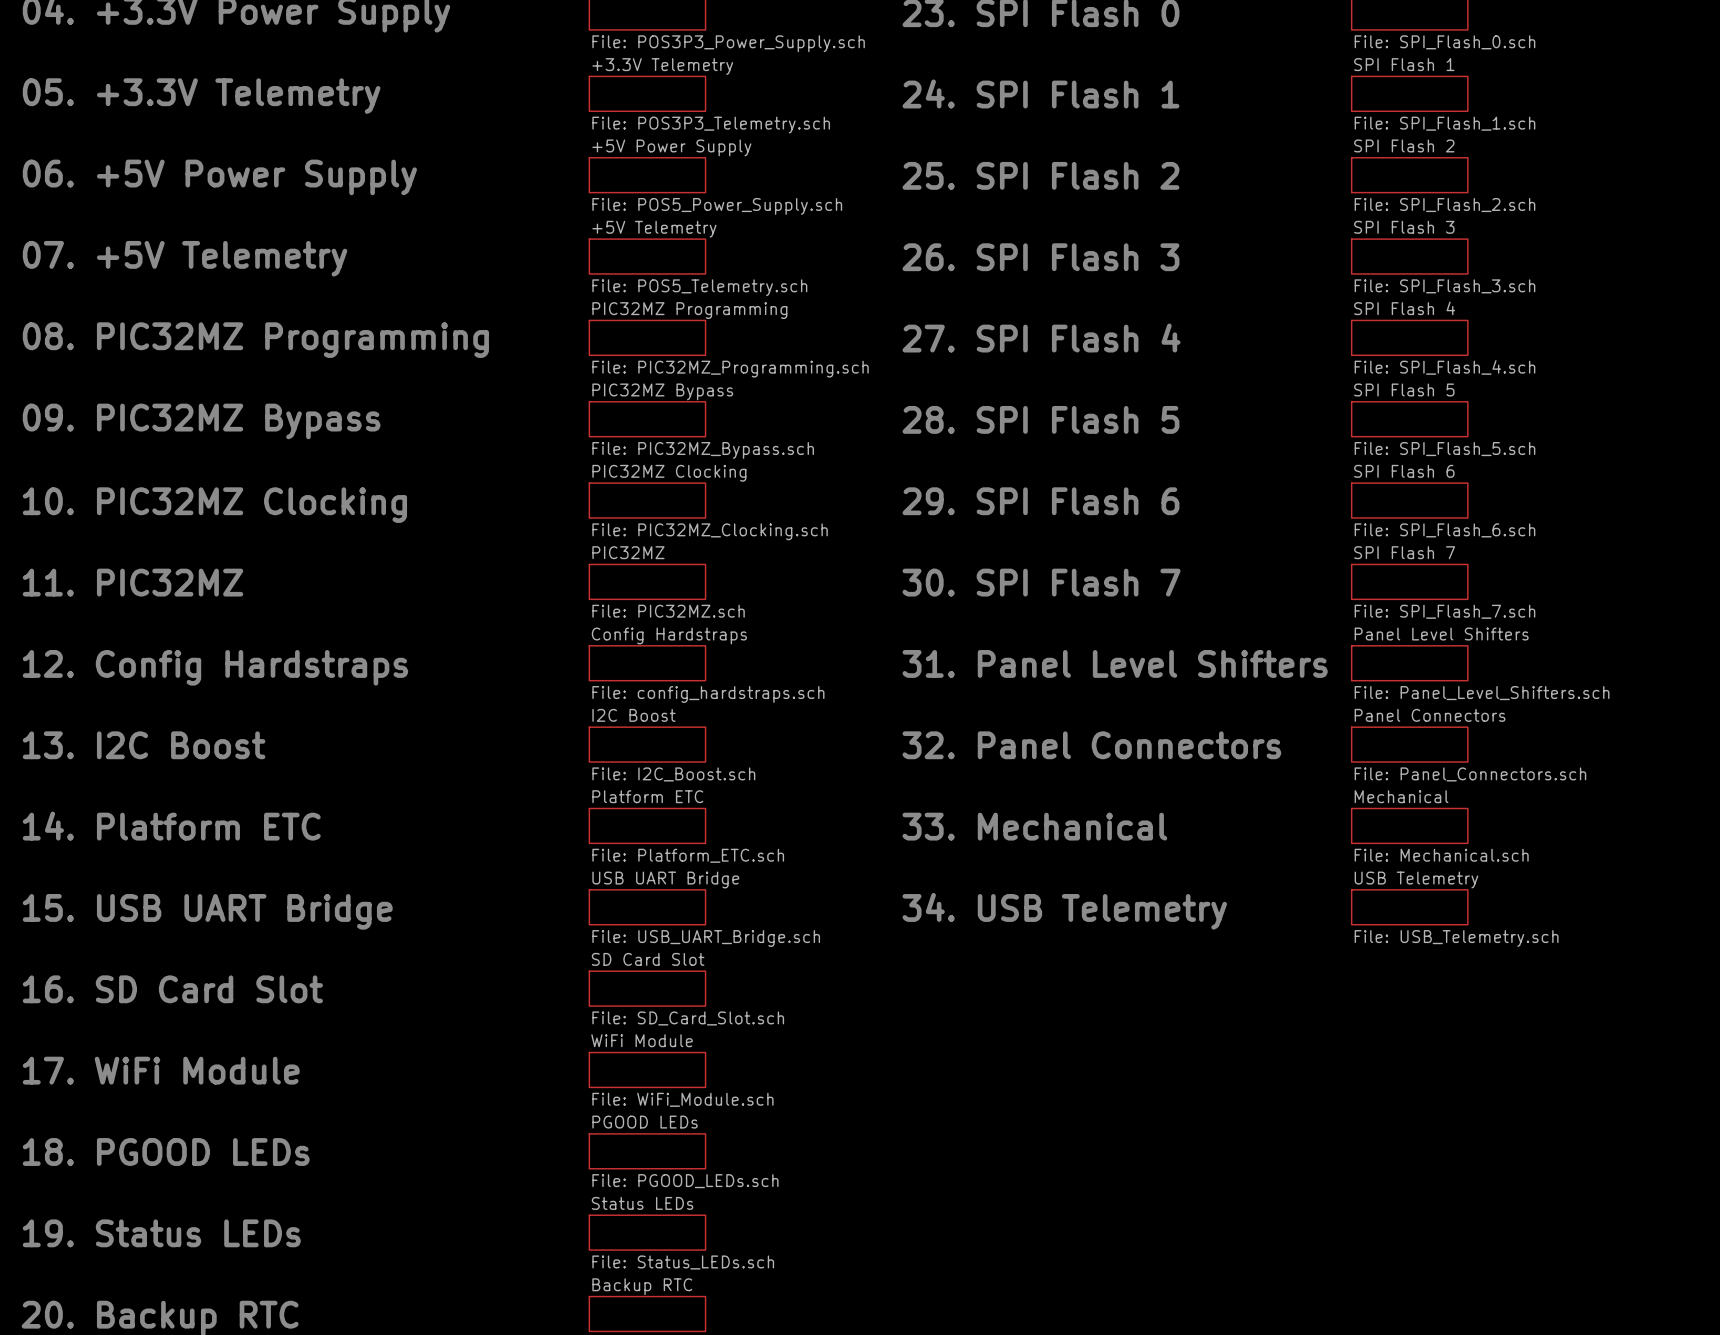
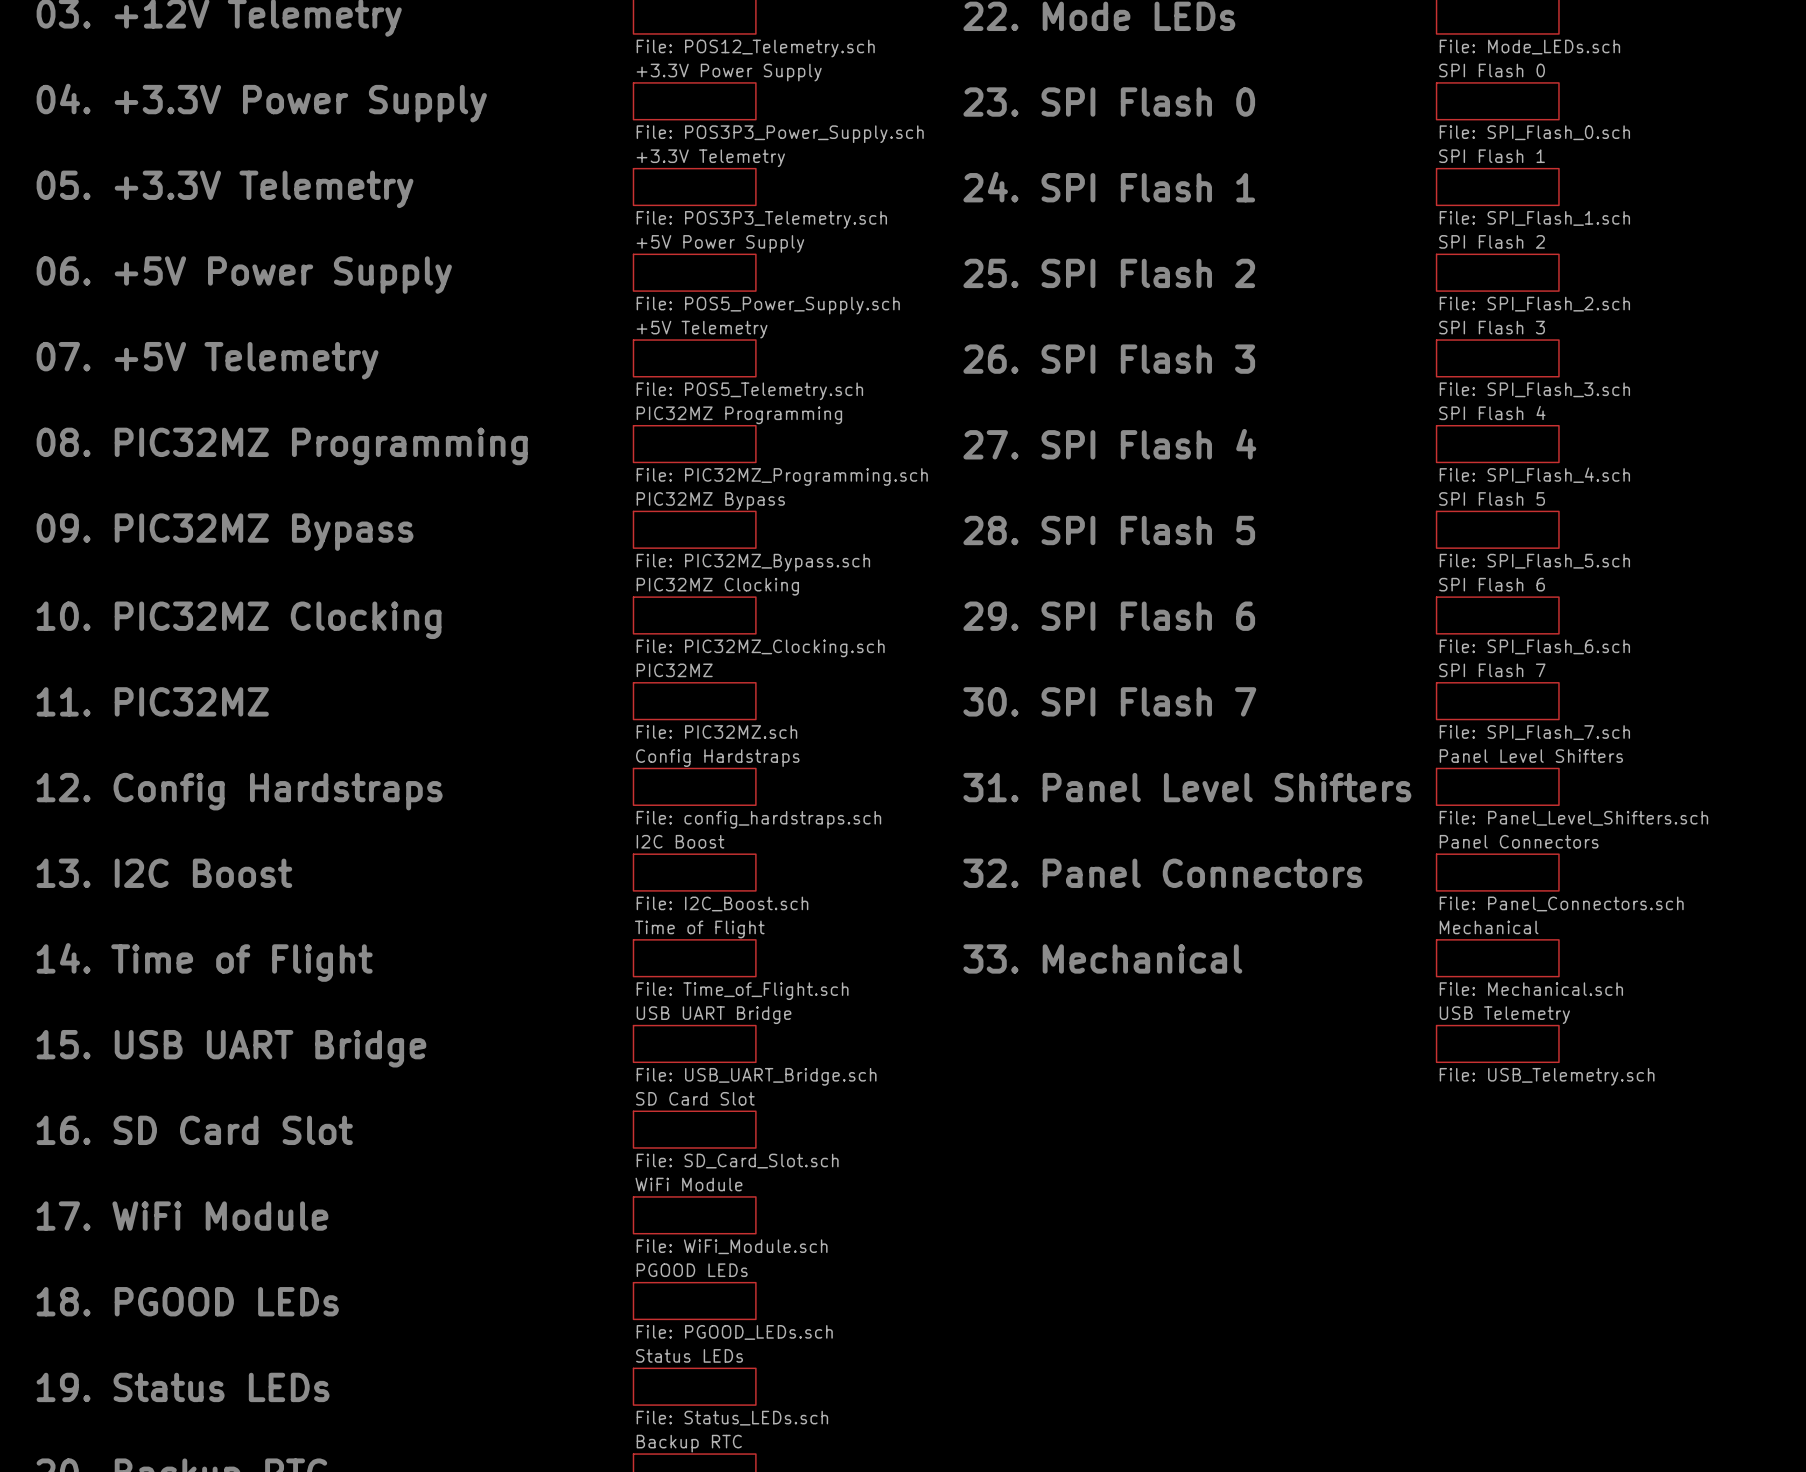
sheet Platform ETC name: Platform ETC (647, 796) -> Time of Flight (699, 929)
text: 14. Platform ETC (171, 826) -> 14. Time of Flight (204, 962)
sheet Platform ETC value: File: Platform_ETC.sch (688, 855) -> File: Time_of_Flight.sch (742, 991)
text: 34. USB Telemetry (1064, 911) -> none

